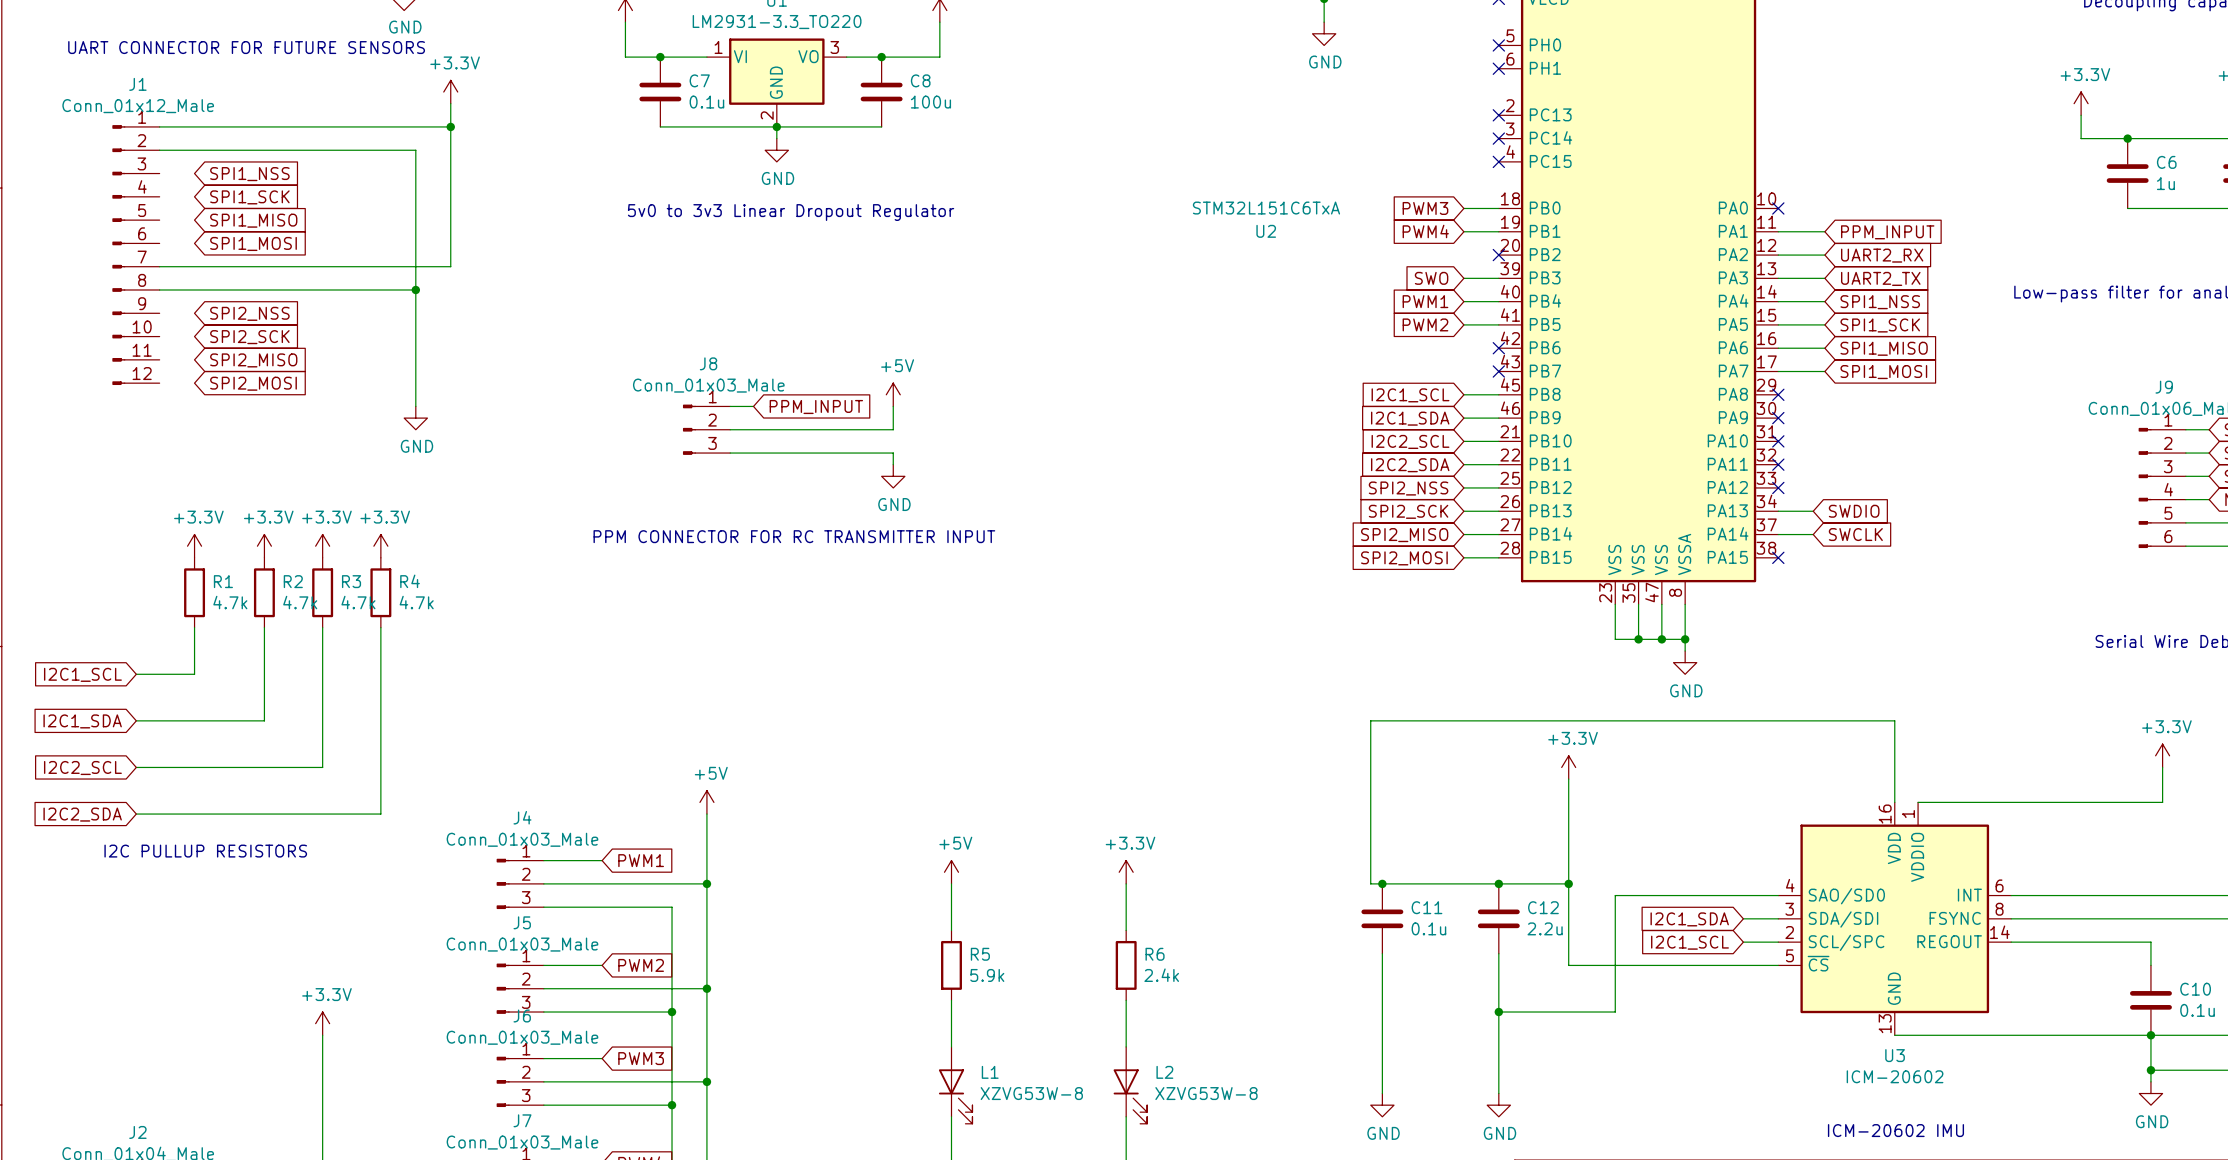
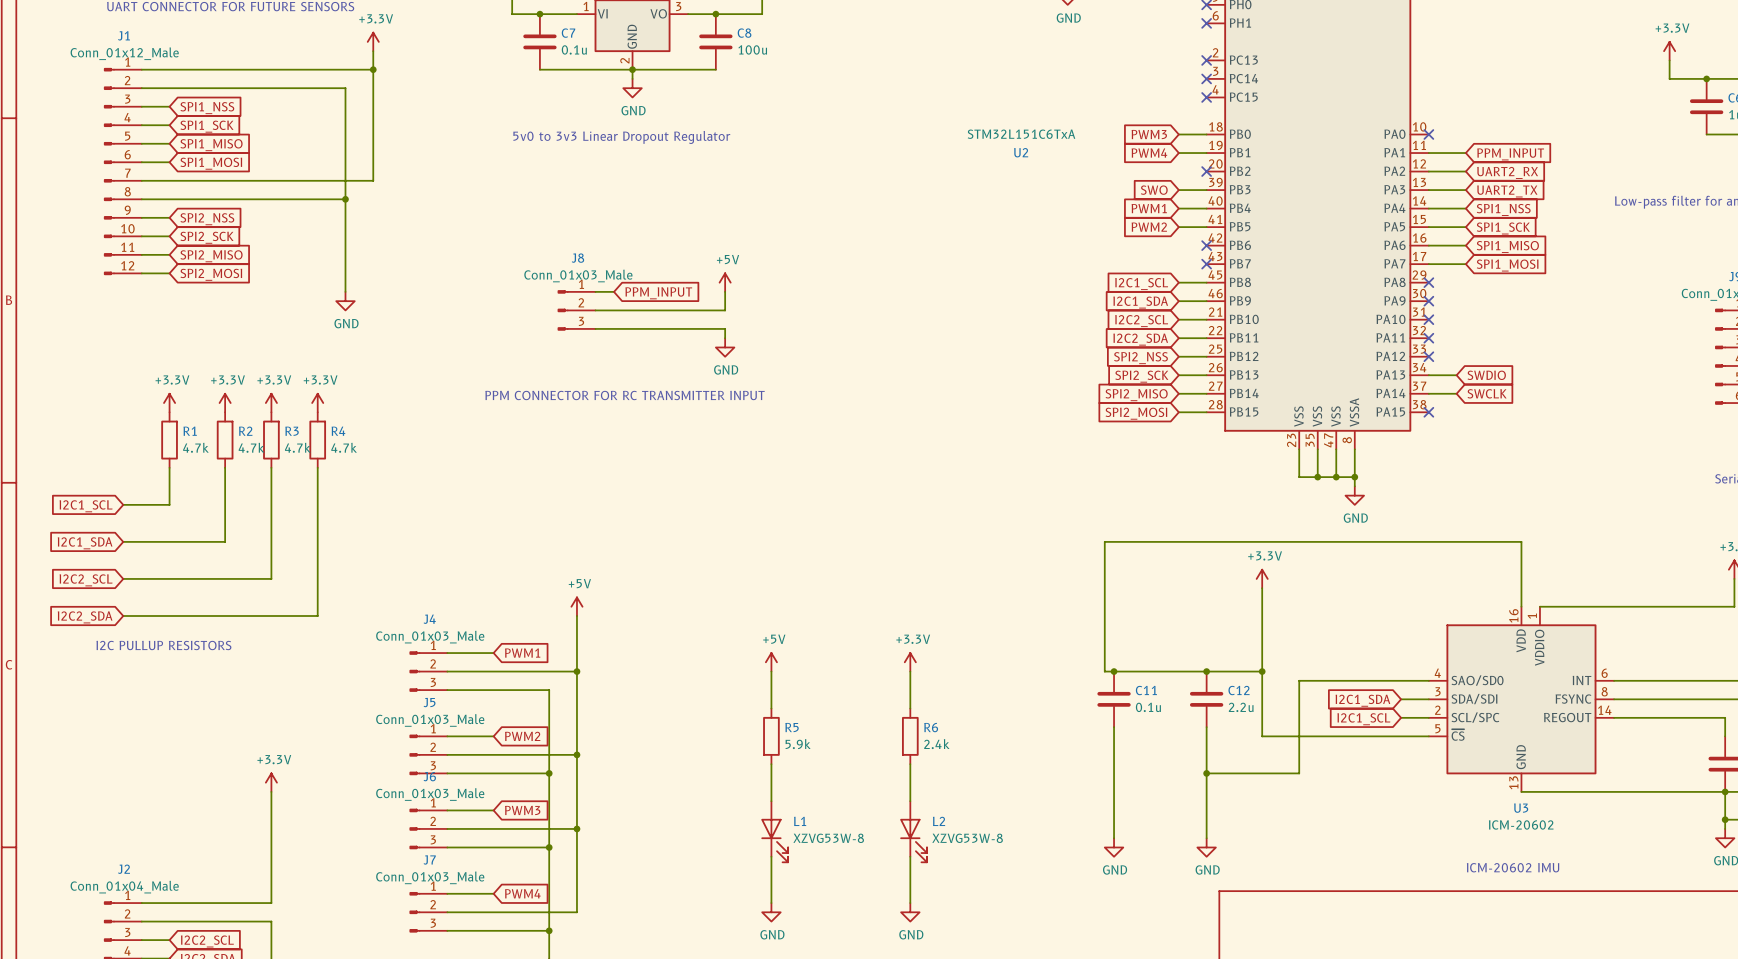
wire: none -> (141, 106) (169, 106)
wire: none -> (141, 125) (169, 125)
wire: none -> (141, 143) (169, 143)
wire: none -> (141, 162) (169, 162)
wire: none -> (141, 217) (169, 217)
wire: none -> (141, 236) (169, 236)
wire: none -> (141, 254) (169, 254)
wire: none -> (141, 273) (169, 273)

